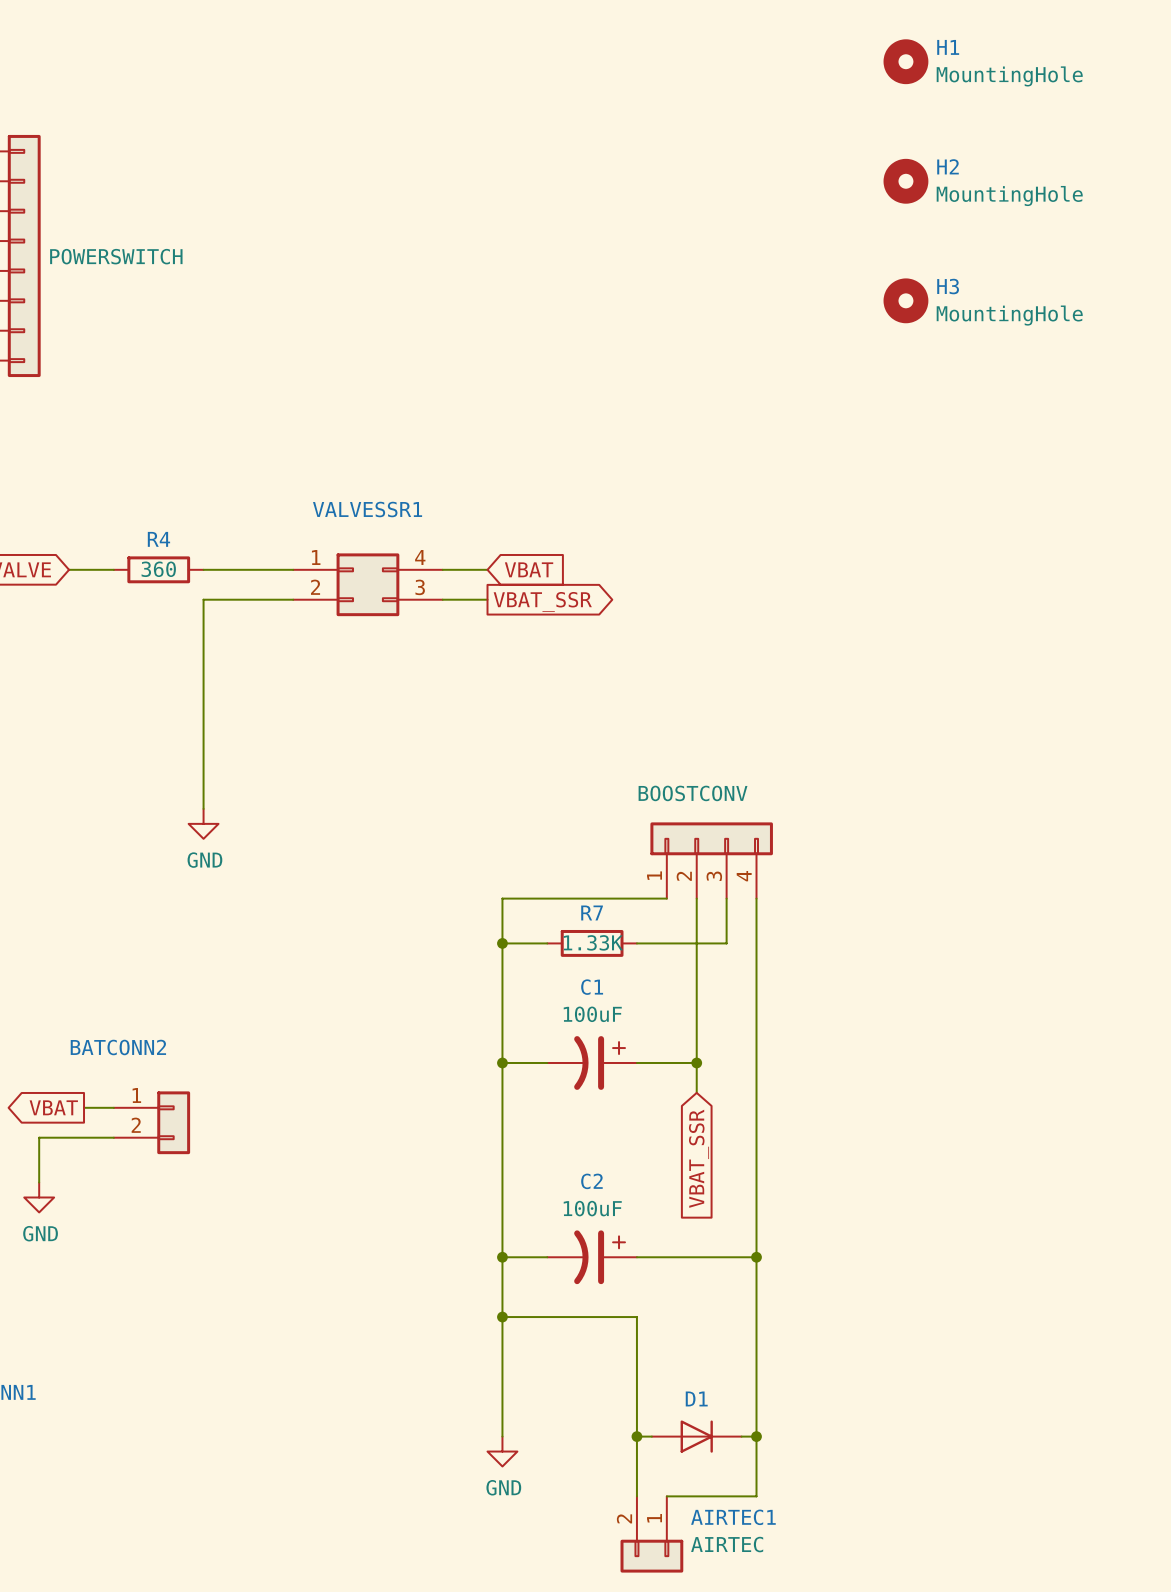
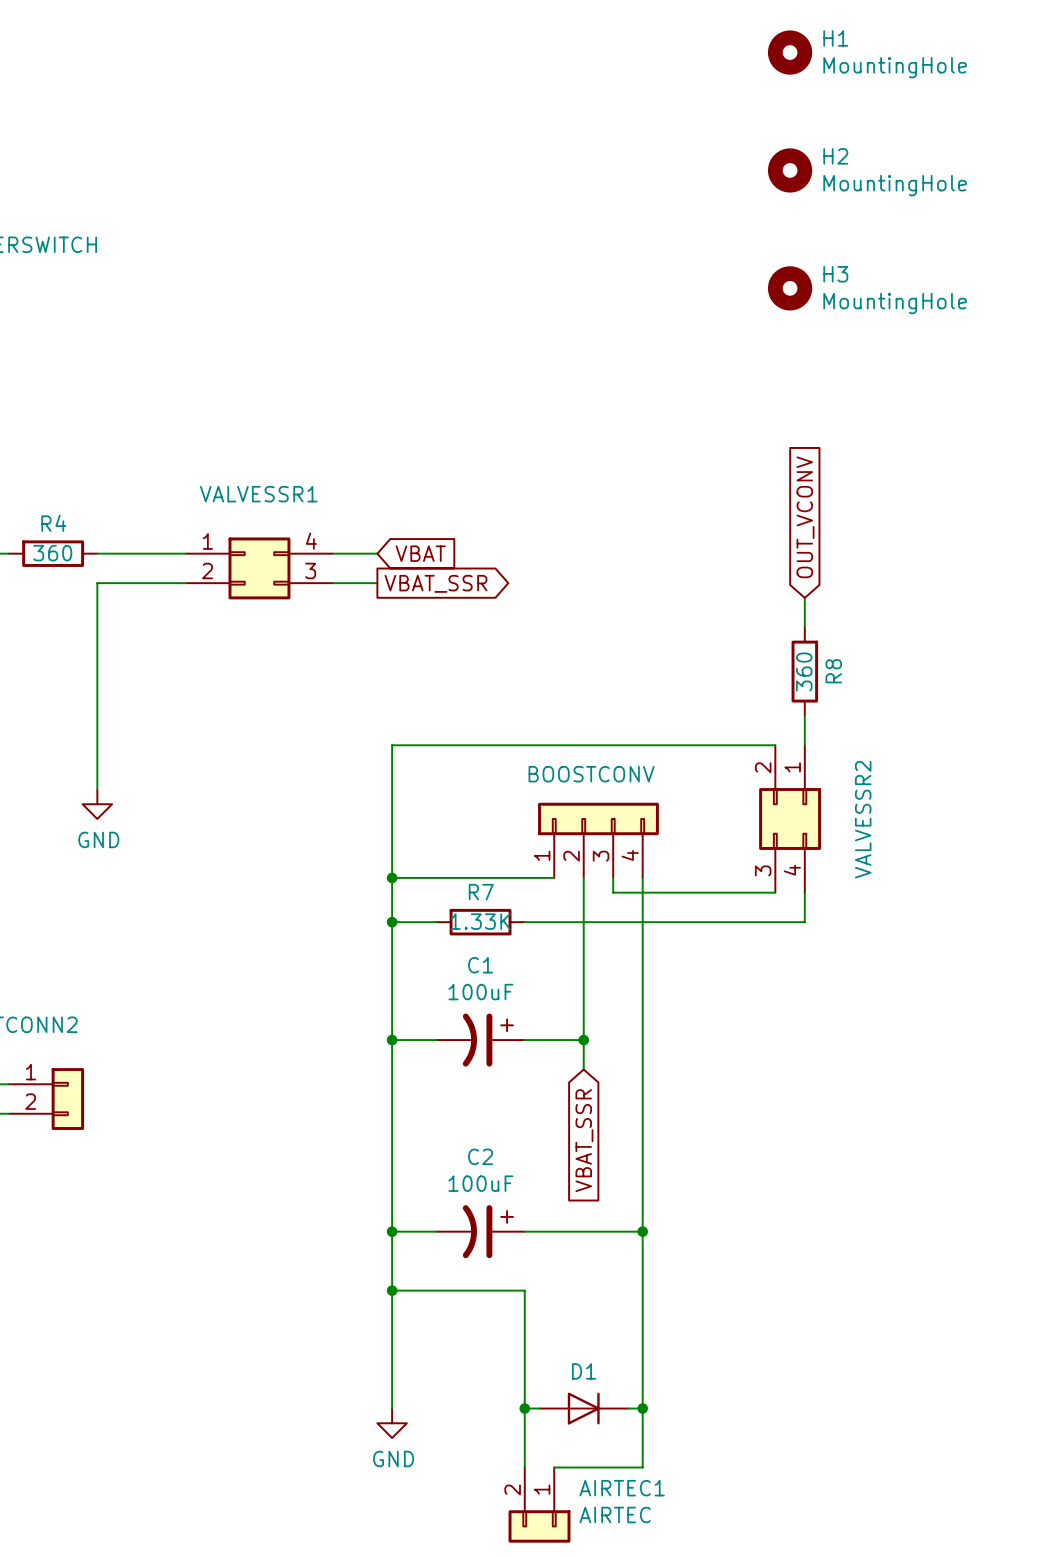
global label: none -> OUT_VCONV (805, 517)
wire: none -> (804, 597) (804, 627)
R8: none -> 360 (804, 671)
wire: none -> (804, 715) (804, 745)
wire: none -> (775, 745) (392, 745) (392, 877)
VALVESSR2: none -> (790, 818)
junction: none -> (392, 877)
wire: (726, 913) (726, 943) -> (613, 892) (775, 892)
wire: none -> (804, 892) (804, 922) (613, 922)

